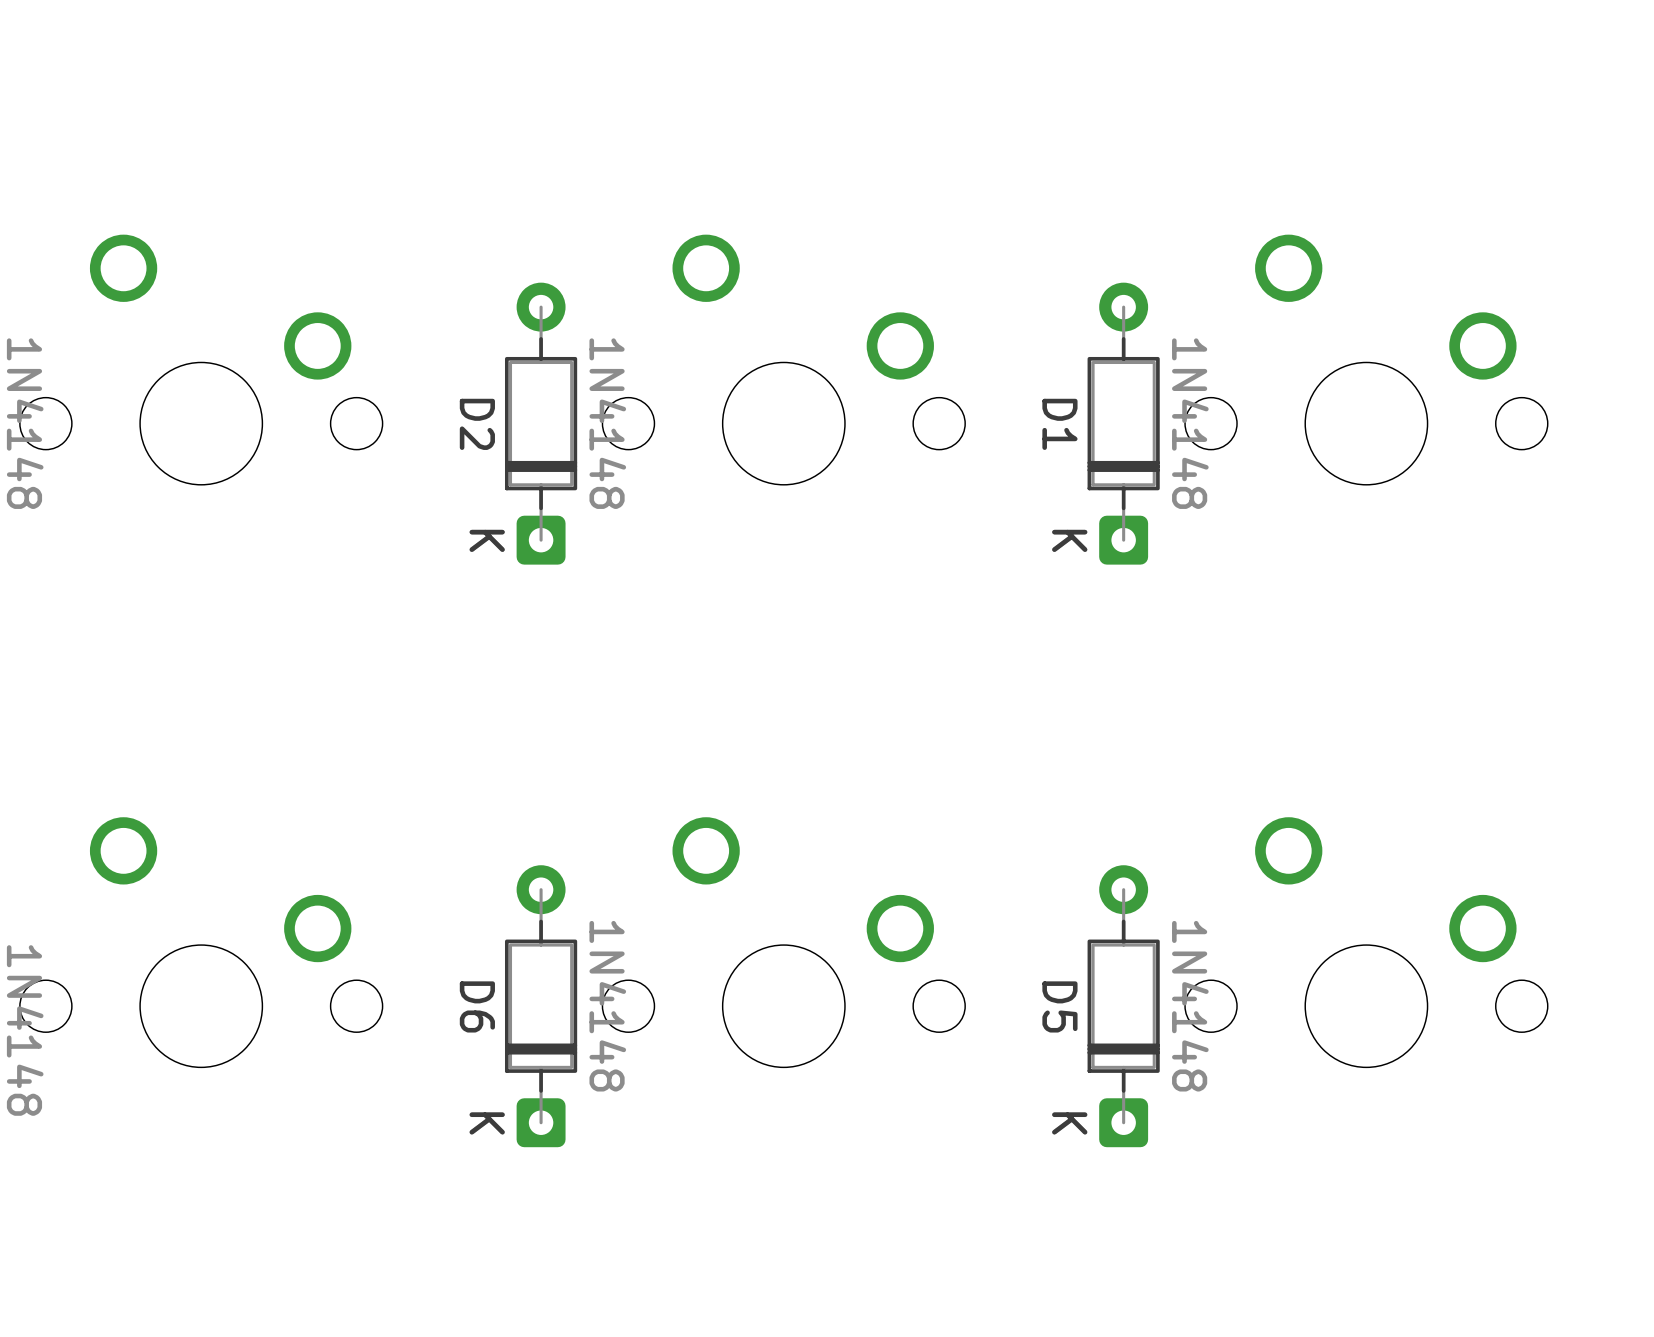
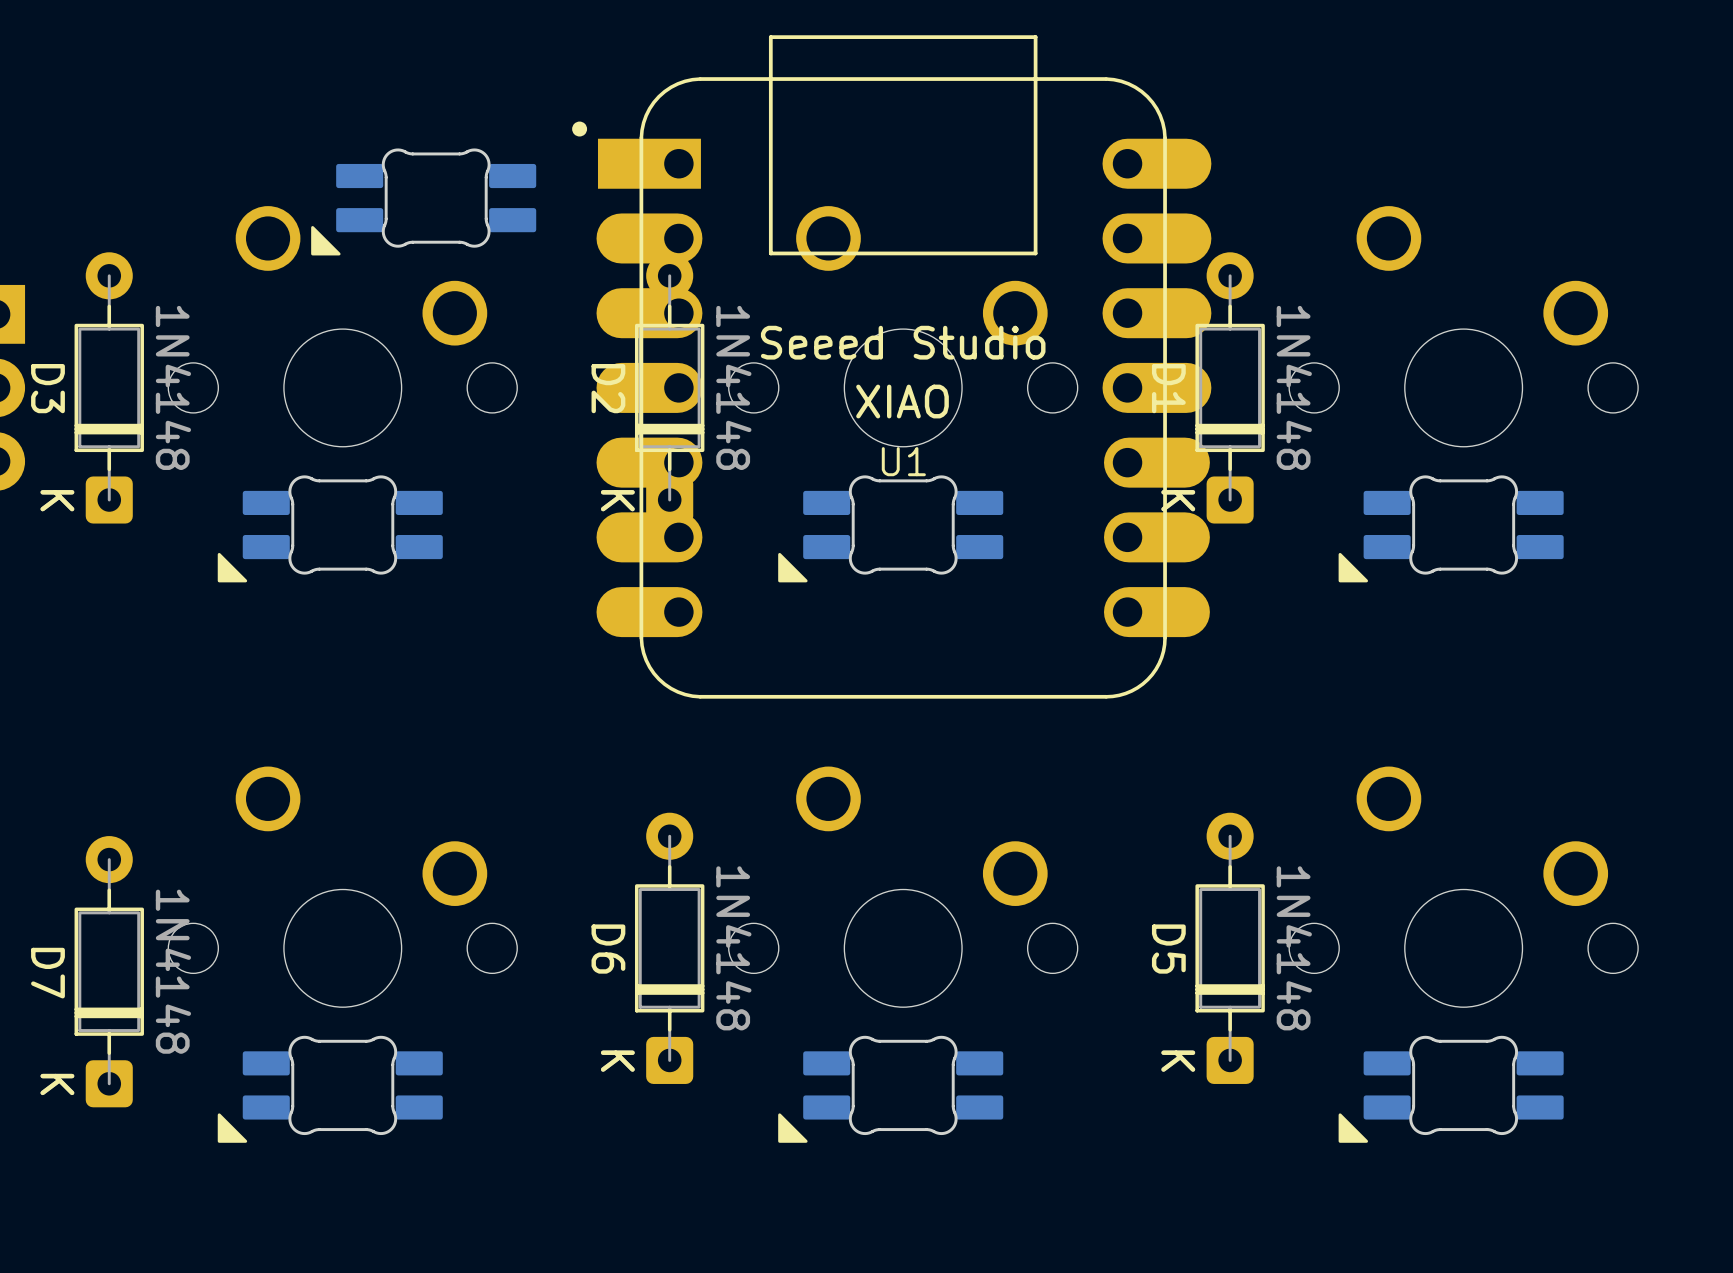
part: none -> (423, 201)
U1: none -> (891, 366)
part: none -> (330, 528)
part: none -> (890, 528)
part: none -> (1451, 528)
part: none -> (330, 1089)
part: none -> (890, 1089)
part: none -> (1451, 1089)

